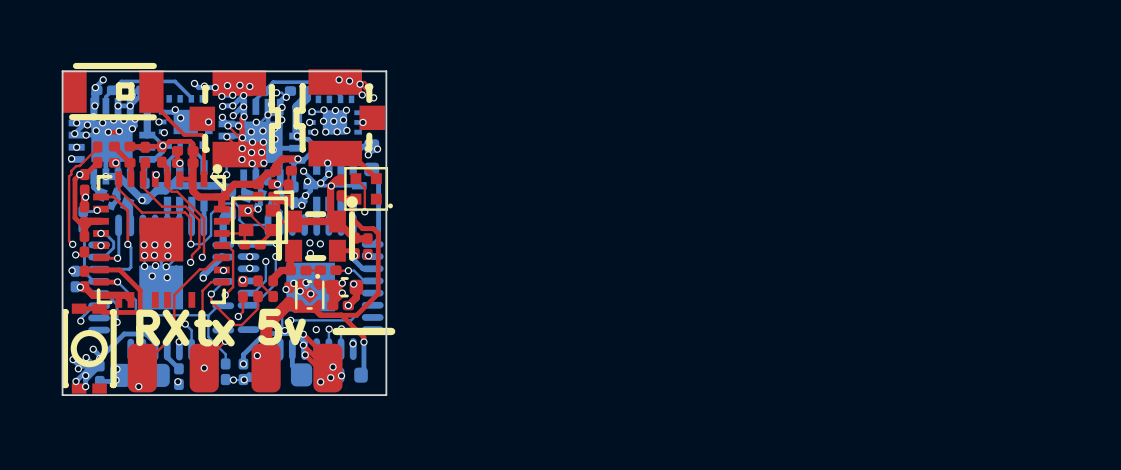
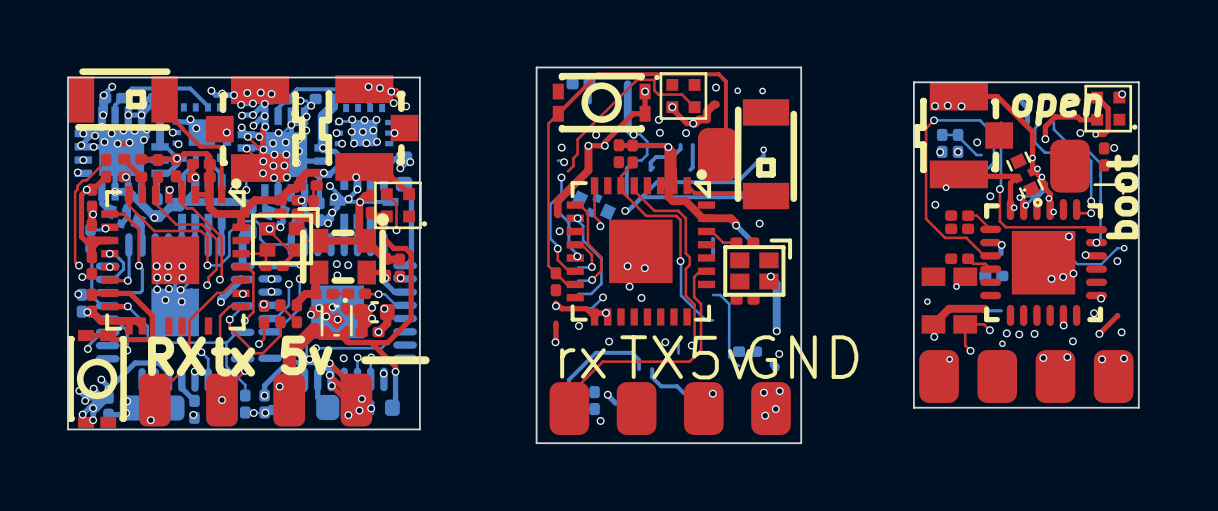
board edge: none -> (536, 67) (801, 67) (801, 443) (536, 443) (536, 67)
board edge: none -> (913, 82) (1138, 82) (1138, 407) (913, 407) (913, 82)
part: none -> (581, 84)
bottom track: none -> (589, 84) (589, 102)
bottom track: none -> (627, 84) (627, 128) (633, 134)
via: none -> (715, 87)
via: none -> (737, 90)
via: none -> (762, 91)
top track: none -> (645, 91) (645, 113) (633, 113) (604, 142) (604, 145)
via: none -> (645, 91)
via: none -> (1122, 94)
part: none -> (680, 96)
top track: none -> (1097, 97) (1108, 108) (1108, 130) (1103, 134) (1095, 134)
part: none -> (601, 102)
bottom track: none -> (1022, 102) (1027, 107) (1027, 122)
top track: none -> (715, 104) (706, 111) (706, 119) (699, 119) (695, 123) (686, 123) (672, 107)
top track: none -> (935, 106) (944, 96) (997, 96) (1032, 131) (1032, 169) (1042, 180)
via: none -> (935, 106)
via: none -> (947, 105)
via: none -> (961, 106)
via: none -> (672, 107)
top track: none -> (694, 107) (681, 94) (658, 94) (654, 90) (654, 79) (637, 79) (577, 139) (577, 154) (573, 158) (573, 166) (567, 171)
part: none -> (1110, 108)
text: none -> open (1057, 109)
via: none -> (658, 119)
top track: none -> (934, 120) (926, 128) (926, 218) (945, 237) (966, 237) (984, 255) (990, 255)
bottom track: none -> (934, 120) (979, 120) (993, 134) (993, 162) (988, 168) (961, 169)
via: none -> (934, 120)
top track: none -> (1097, 119) (1055, 116) (1045, 126) (1045, 138)
bottom track: none -> (1000, 122) (999, 189)
bottom track: none -> (1040, 122) (1035, 128) (1035, 142) (1045, 152) (1082, 152) (1091, 161) (1091, 201)
bottom track: none -> (1053, 122) (1053, 129) (1068, 144) (1081, 144) (1100, 163) (1100, 238) (1096, 242)
via: none -> (693, 123)
via: none -> (659, 132)
via: none -> (686, 133)
via: none -> (1080, 133)
via: none -> (633, 134)
bottom track: none -> (634, 134) (639, 134) (647, 141) (647, 154) (641, 160) (634, 160) (626, 168) (626, 195)
via: none -> (1095, 134)
via: none -> (596, 134)
bottom track: none -> (942, 134) (956, 134) (976, 155) (981, 155)
part: none -> (963, 135)
via: none -> (1045, 139)
via: none -> (977, 142)
part: none -> (942, 143)
part: none -> (958, 143)
top track: none -> (619, 145) (667, 145) (673, 151) (673, 185) (660, 185)
bottom track: none -> (680, 144) (680, 148) (672, 157) (656, 157) (650, 162) (650, 169) (652, 167)
bottom track: none -> (692, 144) (692, 167) (690, 169)
via: none -> (588, 145)
top track: none -> (604, 145) (588, 145) (588, 170) (557, 201) (557, 214)
via: none -> (604, 145)
via: none -> (561, 147)
top track: none -> (668, 147) (668, 196) (672, 201) (685, 201) (702, 218) (730, 218) (736, 223)
via: none -> (668, 147)
via: none -> (1114, 147)
bottom track: none -> (763, 149) (763, 155) (737, 182) (656, 182) (628, 210) (625, 210)
via: none -> (763, 149)
via: none -> (940, 152)
via: none -> (958, 151)
part: none -> (618, 153)
part: none -> (632, 153)
part: none -> (765, 154)
part: none -> (717, 154)
part: none -> (1104, 156)
top track: none -> (717, 158) (725, 150) (725, 81) (718, 74) (597, 74) (548, 123) (548, 265) (567, 284) (575, 284)
via: none -> (1032, 157)
bottom track: none -> (558, 160) (564, 162)
via: none -> (564, 162)
top track: none -> (632, 162) (621, 176) (621, 190) (646, 215) (676, 215) (680, 220) (680, 261)
part: none -> (1070, 166)
via: none -> (1037, 168)
top track: none -> (958, 174) (960, 176) (1017, 176) (1010, 183) (1010, 209)
via: none -> (1041, 177)
bottom track: none -> (561, 177) (561, 193) (550, 204) (550, 238) (557, 246) (557, 248)
via: none -> (561, 177)
part: none -> (1025, 179)
top track: none -> (1042, 180) (1045, 183) (1045, 188) (1050, 193) (1050, 209)
line: none -> (1094, 184) (1123, 184) (1123, 193)
top track: none -> (594, 185) (594, 216) (600, 221) (600, 225)
top track: none -> (634, 185) (634, 190) (654, 210) (678, 210) (685, 218) (685, 253) (689, 257) (689, 264) (685, 268) (685, 295) (694, 304) (694, 342) (691, 345)
top track: none -> (687, 185) (694, 193) (754, 193) (757, 196)
via: none -> (946, 187)
bottom track: none -> (1043, 188) (1025, 205)
bottom track: none -> (1047, 188) (1039, 196) (1019, 197)
top track: none -> (999, 189) (999, 221) (1005, 227) (1094, 227) (1096, 229)
via: none -> (999, 189)
via: none -> (990, 196)
bottom track: none -> (641, 197) (756, 197) (760, 201)
via: none -> (1019, 197)
text: none -> boot (1122, 196)
via: none -> (1048, 198)
via: none -> (1091, 201)
top track: none -> (575, 205) (580, 205) (587, 212) (587, 243) (601, 257) (601, 270) (592, 279)
part: none -> (594, 205)
via: none -> (935, 204)
via: none -> (1025, 205)
via: none -> (1014, 207)
top track: none -> (1076, 209) (1080, 213) (1091, 213)
via: none -> (625, 210)
bottom track: none -> (559, 212) (568, 222) (568, 246) (578, 255)
via: none -> (1053, 211)
via: none -> (1091, 213)
part: none -> (959, 215)
top track: none -> (968, 215) (976, 215) (990, 229)
via: none -> (577, 218)
bottom track: none -> (577, 219) (583, 225) (583, 240) (601, 258) (601, 283) (591, 293) (578, 293)
via: none -> (759, 223)
bottom track: none -> (736, 225) (754, 244)
via: none -> (736, 225)
via: none -> (600, 226)
part: none -> (959, 228)
via: none -> (559, 231)
top track: none -> (706, 231) (712, 231) (723, 242) (736, 242)
via: none -> (1068, 236)
bottom track: none -> (713, 238) (713, 254)
part: none -> (744, 242)
via: none -> (1096, 242)
top track: none -> (575, 244) (581, 244) (591, 254) (591, 266)
bottom track: none -> (1001, 245) (1000, 253)
via: none -> (1001, 245)
part: none -> (640, 247)
top track: none -> (557, 248) (557, 260) (568, 271) (575, 271)
via: none -> (557, 248)
bottom track: none -> (1124, 248) (1117, 248) (1101, 264) (1077, 264) (1067, 253)
via: none -> (1124, 248)
via: none -> (1085, 255)
via: none -> (577, 256)
part: none -> (959, 258)
top track: none -> (968, 258) (973, 263) (985, 263) (990, 269)
bottom track: none -> (680, 261) (681, 295) (705, 320) (713, 320)
via: none -> (680, 261)
via: none -> (1117, 261)
part: none -> (1043, 262)
via: none -> (627, 266)
bottom track: none -> (591, 266) (578, 267)
via: none -> (591, 266)
via: none -> (644, 268)
part: none -> (757, 267)
top track: none -> (706, 271) (699, 271) (694, 277) (694, 297) (701, 304) (701, 350) (689, 361) (602, 361) (565, 399)
via: none -> (1073, 273)
part: none -> (993, 275)
via: none -> (770, 276)
via: none -> (1063, 277)
via: none -> (1051, 278)
bottom track: none -> (592, 279) (578, 280)
via: none -> (592, 279)
part: none -> (555, 281)
bottom track: none -> (776, 283) (776, 331)
via: none -> (629, 286)
via: none -> (956, 286)
bottom track: none -> (713, 295) (720, 295) (729, 304) (729, 356) (739, 365)
bottom track: none -> (603, 297) (592, 308) (578, 308)
via: none -> (603, 297)
via: none -> (641, 297)
via: none -> (1101, 298)
part: none -> (745, 299)
part: none -> (949, 300)
via: none -> (927, 301)
top track: none -> (555, 302) (561, 308) (586, 308) (594, 316) (598, 313) (605, 313) (607, 316)
via: none -> (555, 306)
top track: none -> (985, 309) (949, 308) (933, 324)
bottom track: none -> (985, 310) (1001, 310)
via: none -> (605, 313)
via: none -> (1094, 313)
top track: none -> (1117, 315) (1099, 333)
top track: none -> (555, 323) (555, 342)
via: none -> (578, 325)
via: none -> (1063, 325)
top track: none -> (989, 330) (984, 324) (965, 324) (965, 345) (970, 350)
via: none -> (989, 330)
via: none -> (776, 331)
via: none -> (1121, 332)
via: none -> (1006, 333)
via: none -> (1019, 334)
via: none -> (1034, 333)
via: none -> (1099, 333)
via: none -> (934, 336)
via: none -> (555, 342)
via: none -> (609, 341)
via: none -> (665, 342)
via: none -> (1072, 341)
bottom track: none -> (678, 344) (678, 353)
via: none -> (1002, 343)
via: none -> (691, 345)
via: none -> (970, 350)
part: none -> (747, 351)
via: none -> (779, 353)
text: none -> TX (651, 357)
text: none -> GND (803, 357)
via: none -> (1067, 357)
text: none -> 5v (721, 357)
via: none -> (1043, 357)
via: none -> (1123, 358)
via: none -> (949, 359)
via: none -> (1102, 359)
text: none -> rx (582, 363)
bottom track: none -> (773, 364) (775, 368)
bottom track: none -> (638, 369) (638, 359) (631, 352) (595, 352) (569, 379) (569, 399) (578, 408) (594, 408)
bottom track: none -> (652, 369) (652, 377) (661, 386) (677, 386) (684, 393)
part: none -> (939, 376)
part: none -> (997, 376)
part: none -> (1055, 376)
part: none -> (1113, 376)
via: none -> (779, 391)
via: none -> (763, 392)
via: none -> (712, 393)
bottom track: none -> (607, 395) (615, 403)
via: none -> (607, 394)
part: none -> (594, 400)
part: none -> (569, 408)
part: none -> (636, 408)
part: none -> (703, 408)
part: none -> (771, 408)
via: none -> (775, 409)
via: none -> (765, 415)
via: none -> (600, 420)

